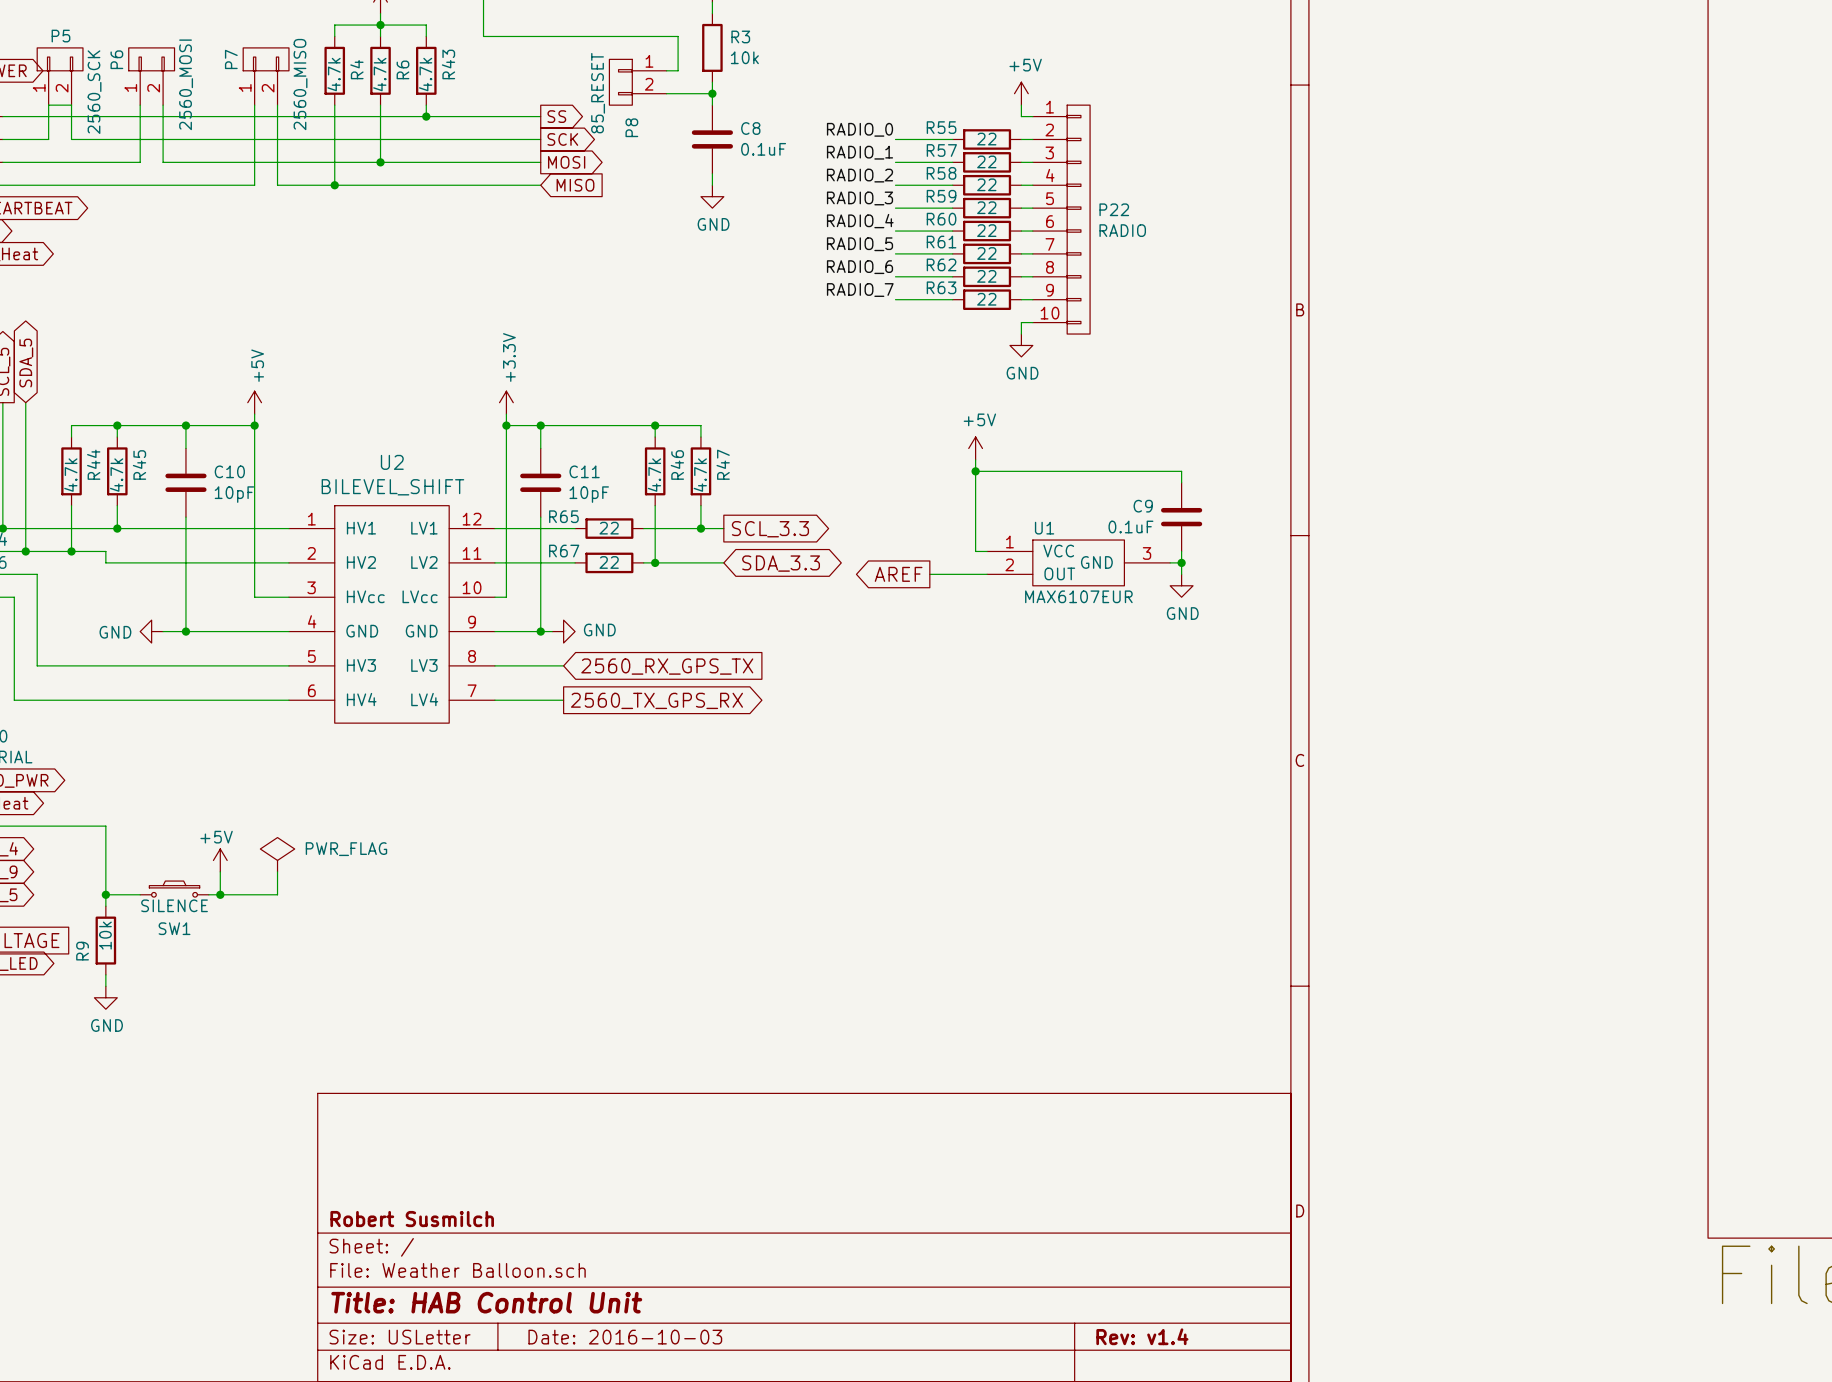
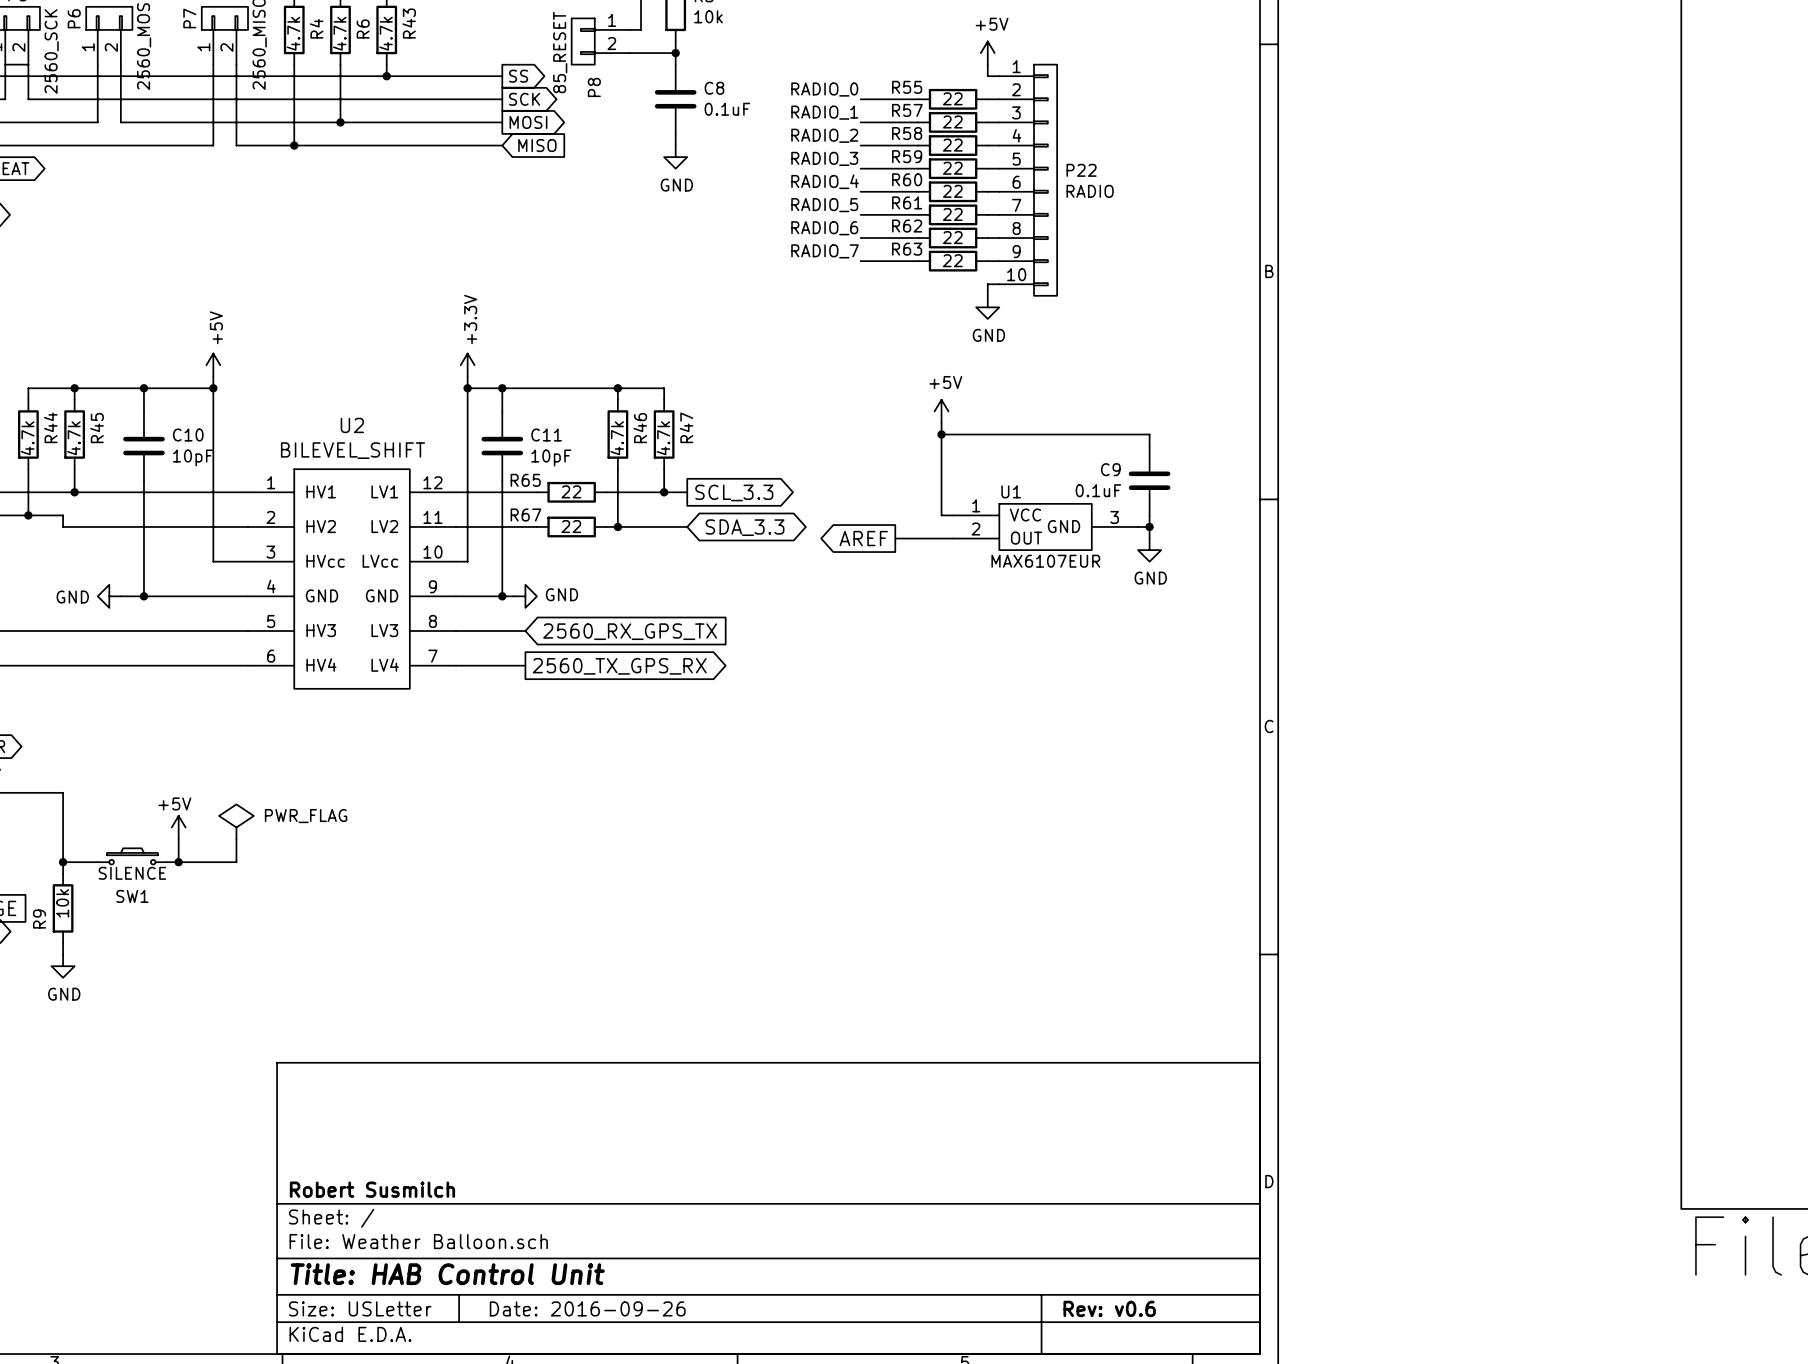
title block: Rev: v1.4 (1142, 1336) -> Rev: v0.6 (1109, 1308)
title block: Date: 2016-10-03 (625, 1337) -> Date: 2016-09-26 (587, 1308)

